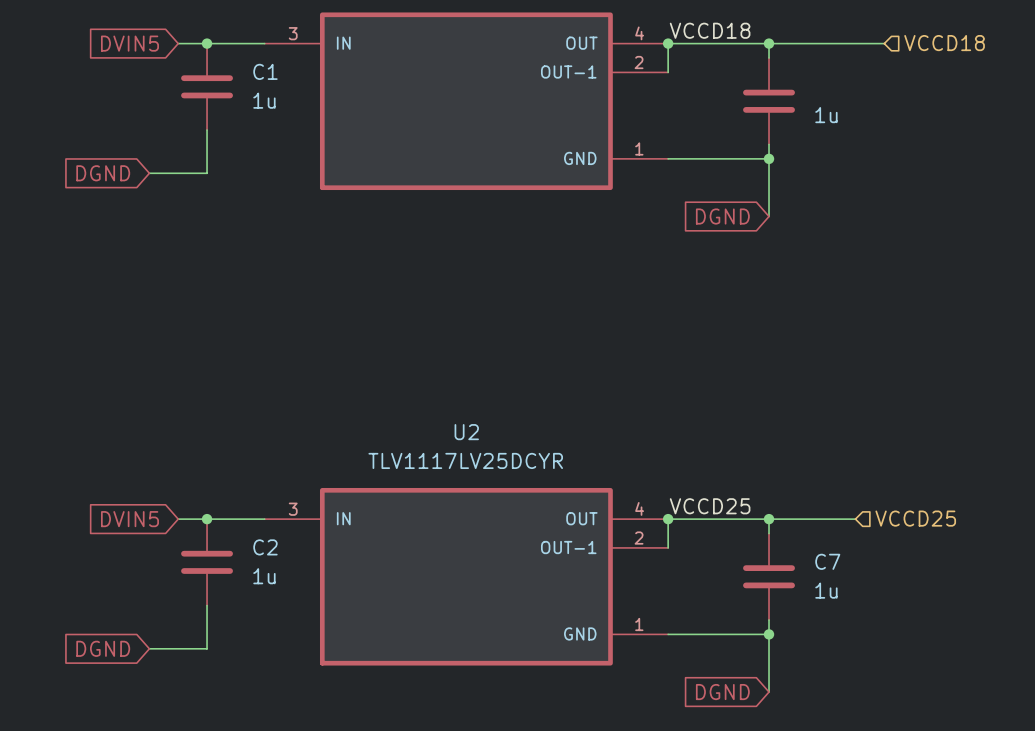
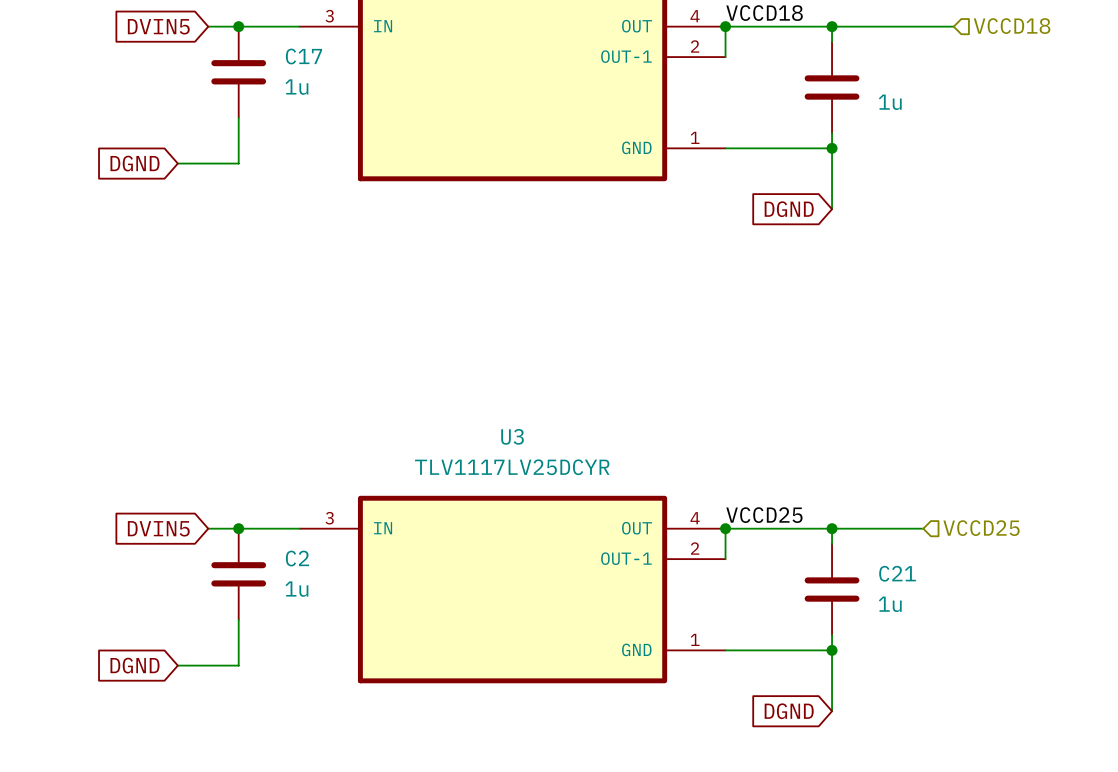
C1 name: C1 (265, 71) -> C17 (303, 56)
U2 name: U2 (466, 432) -> U3 (512, 436)
C7 name: C7 (827, 561) -> C21 (897, 573)

